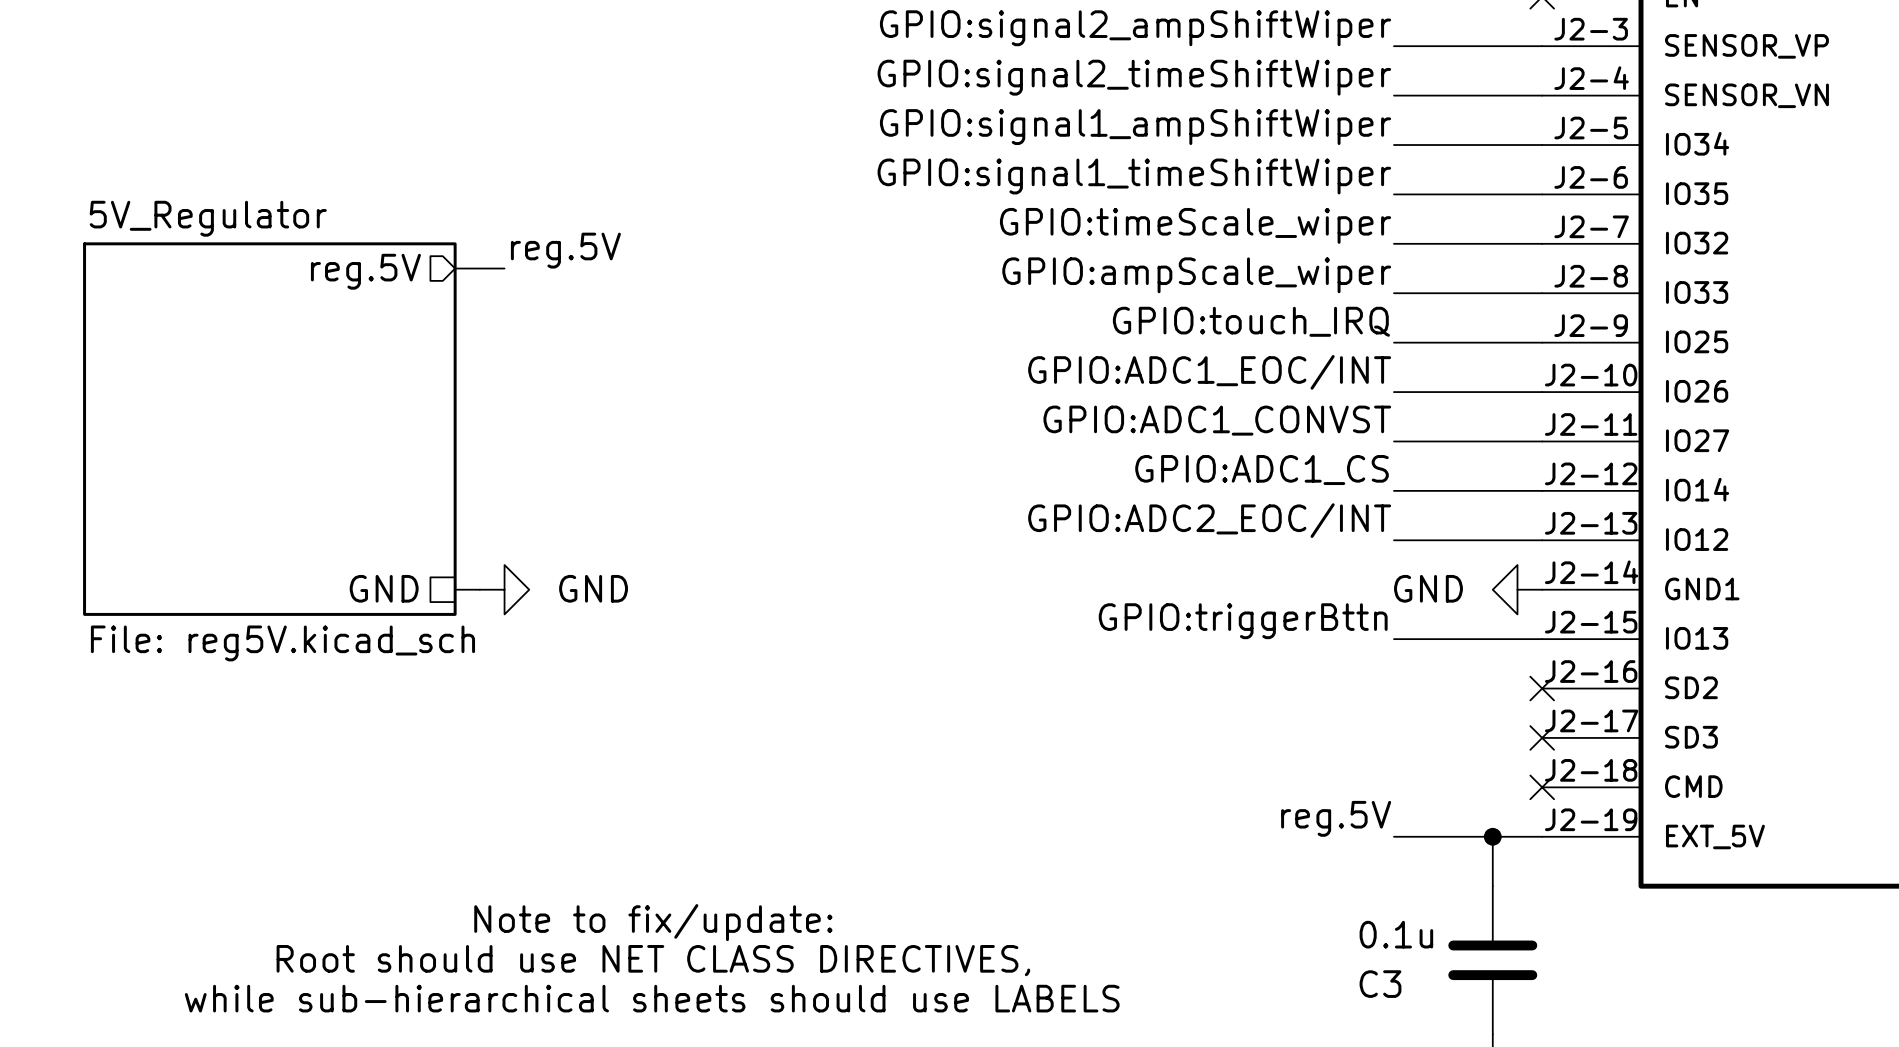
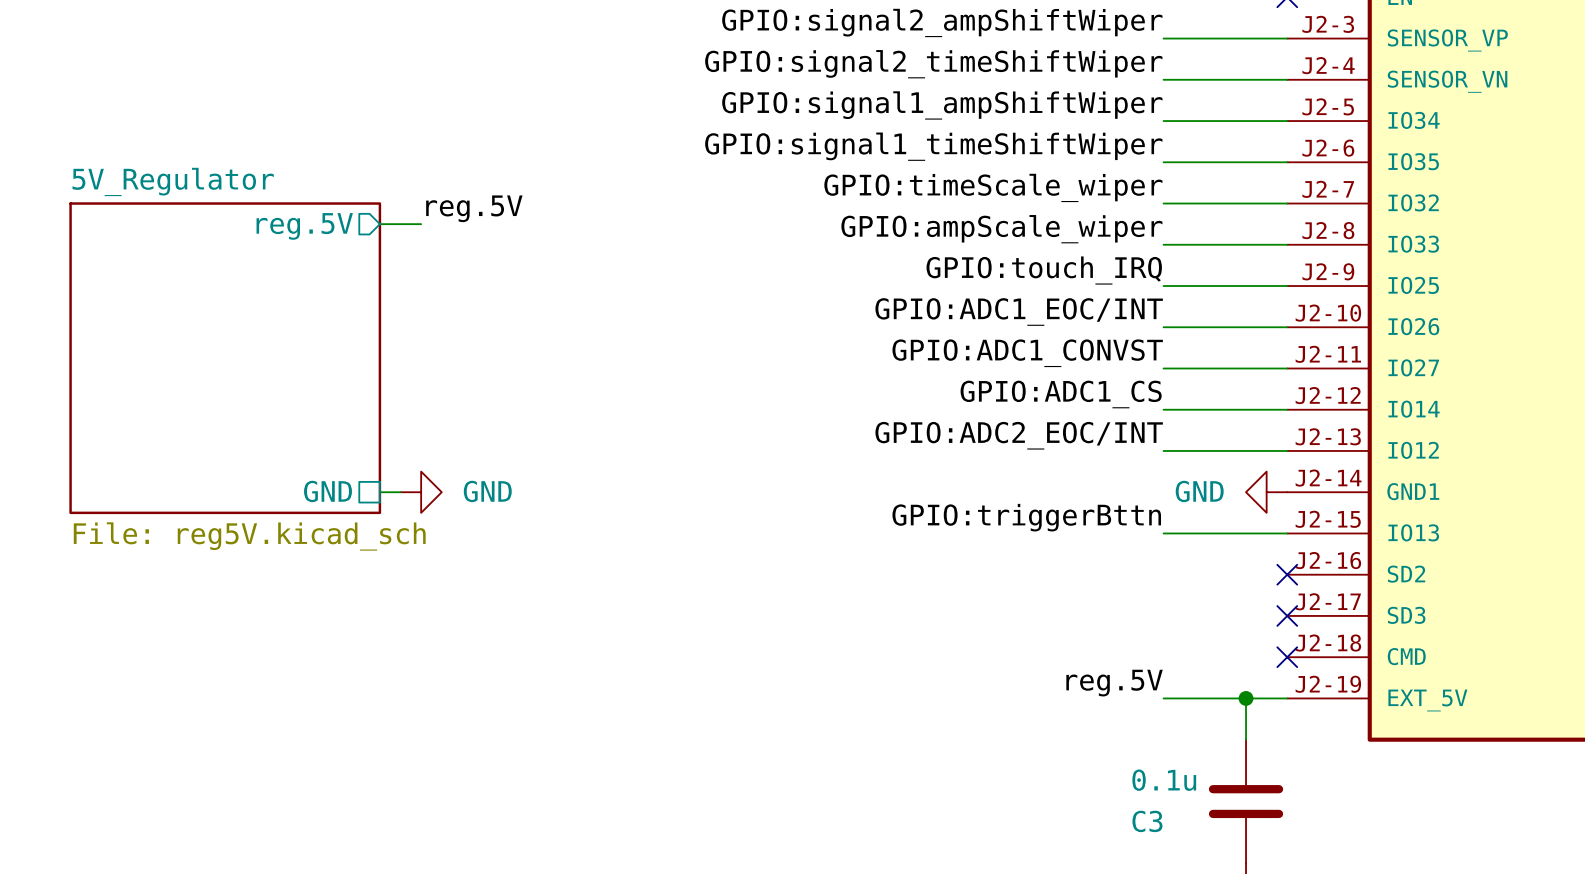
text: Note to fix/update: (653, 922) -> none
text: Root should use NET CLASS DIRECTIVES, (653, 960) -> none
text: while sub-hierarchical sheets should use LABELS (652, 998) -> none

